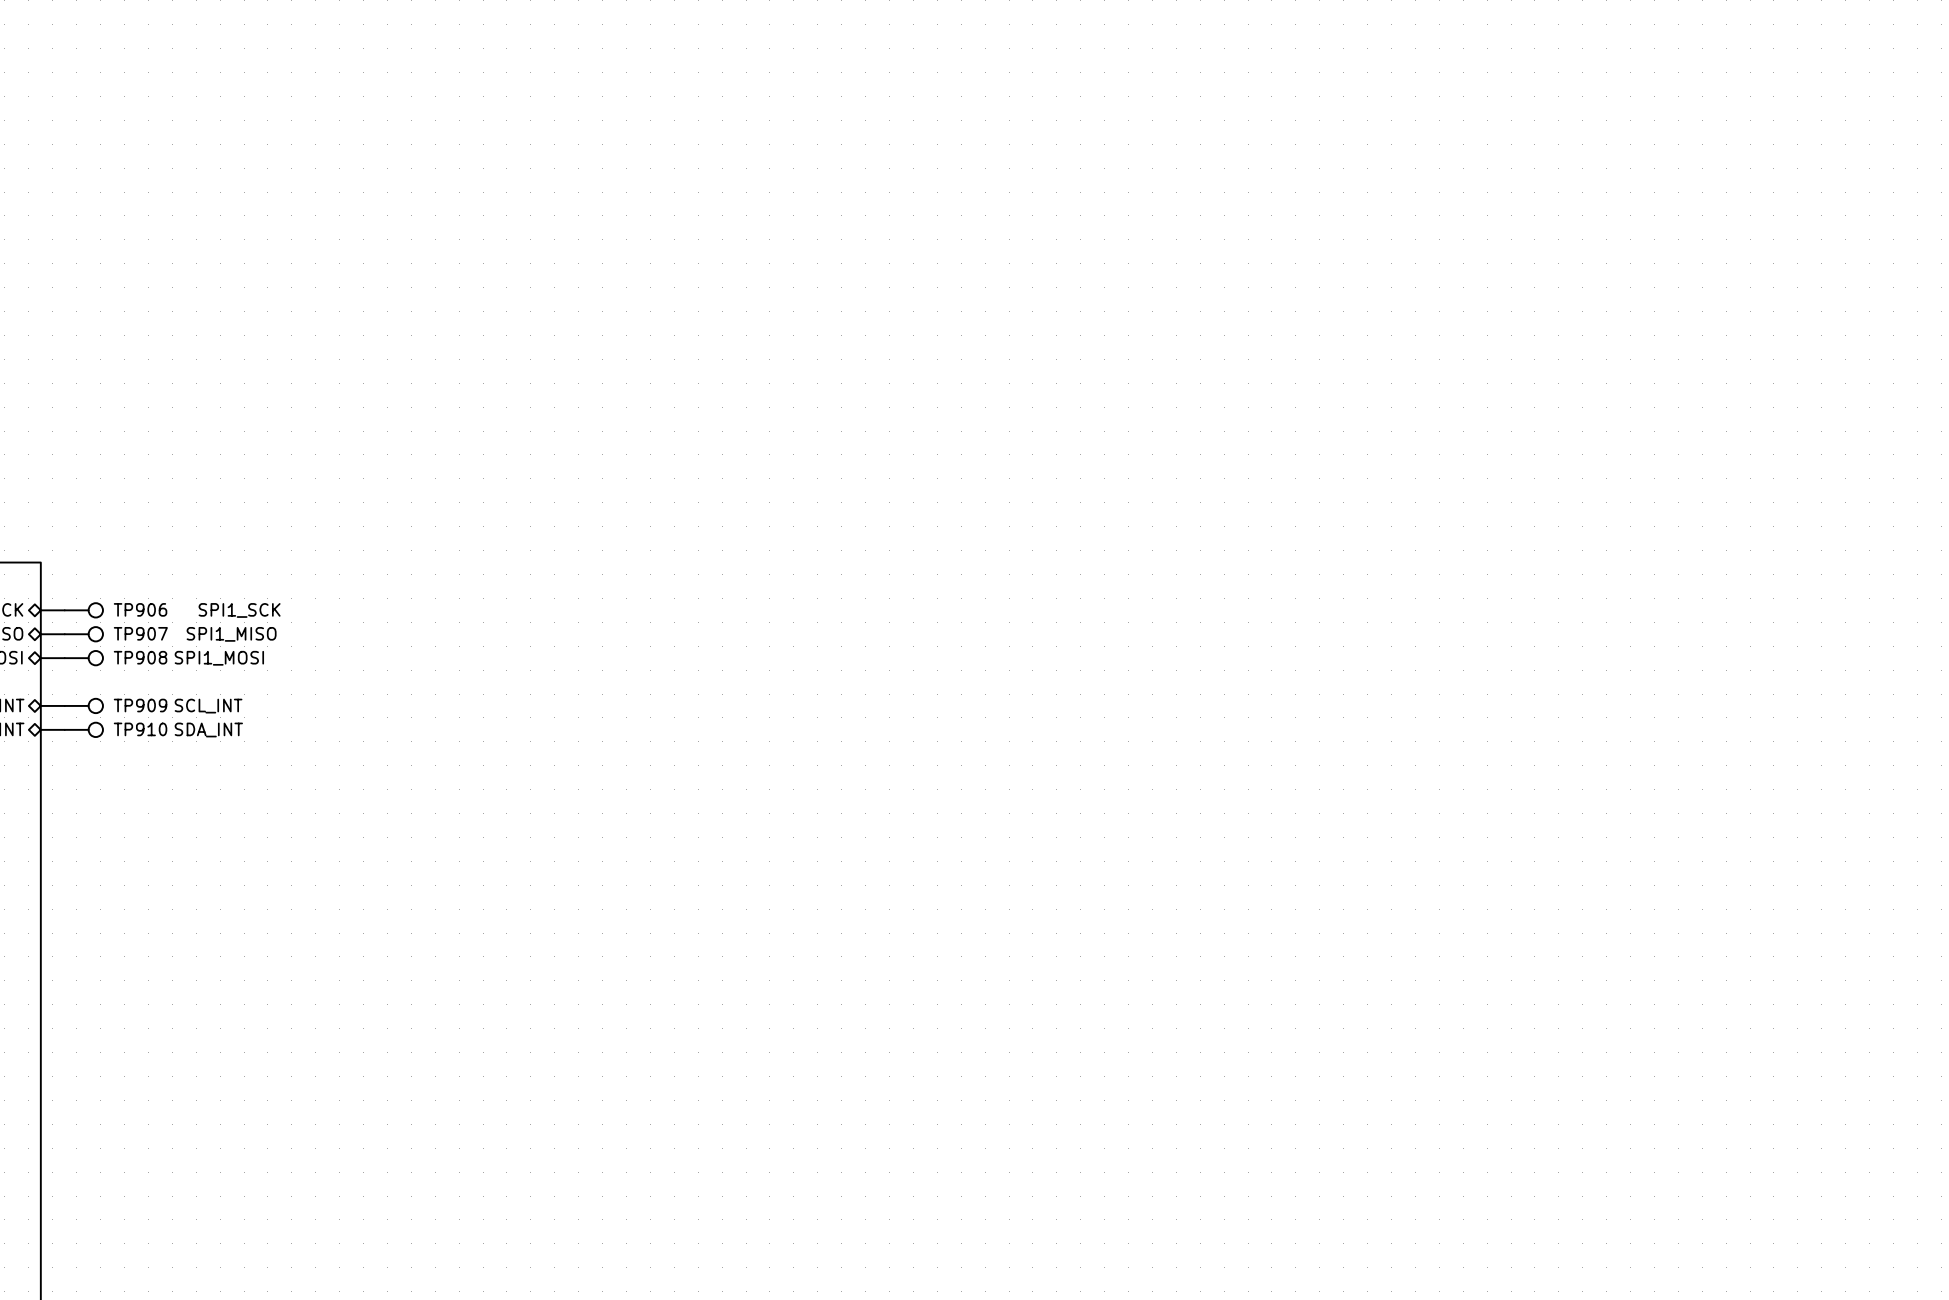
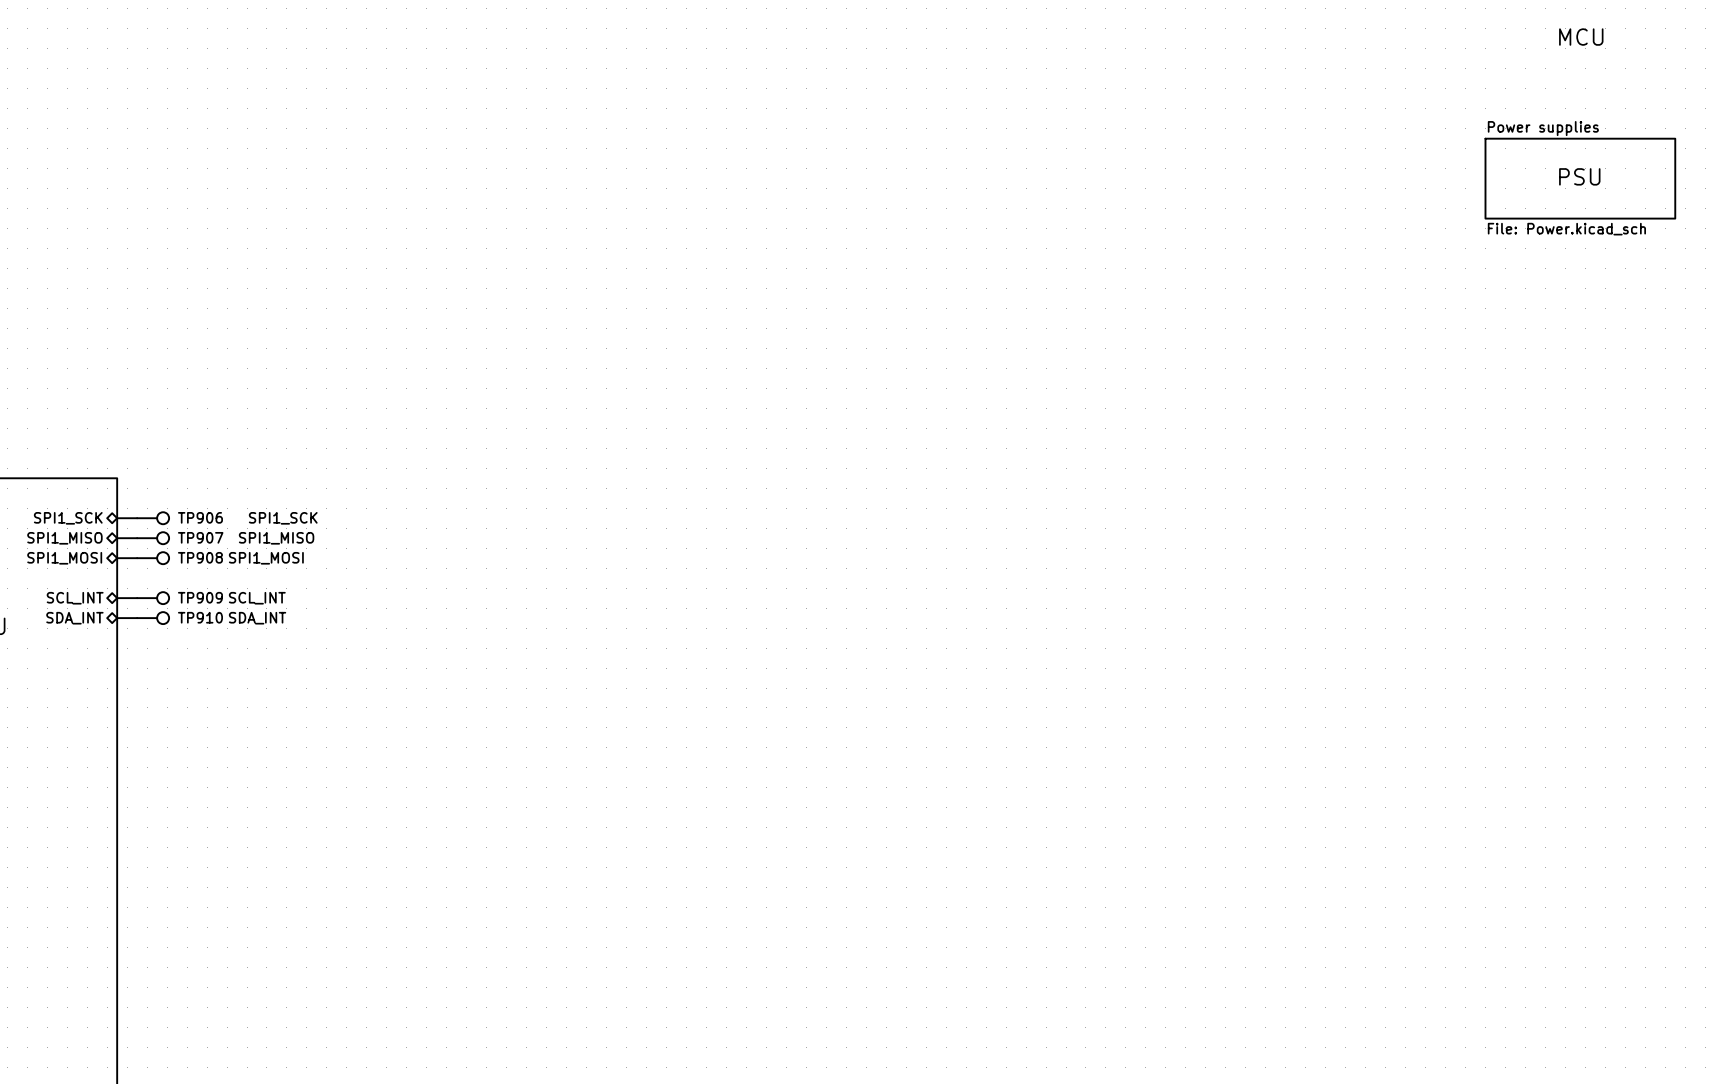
text: none -> MCU (1581, 37)
text: none -> PSU (1579, 176)
sheet Power supplies: none -> File: Power.kicad_sch (1580, 178)

